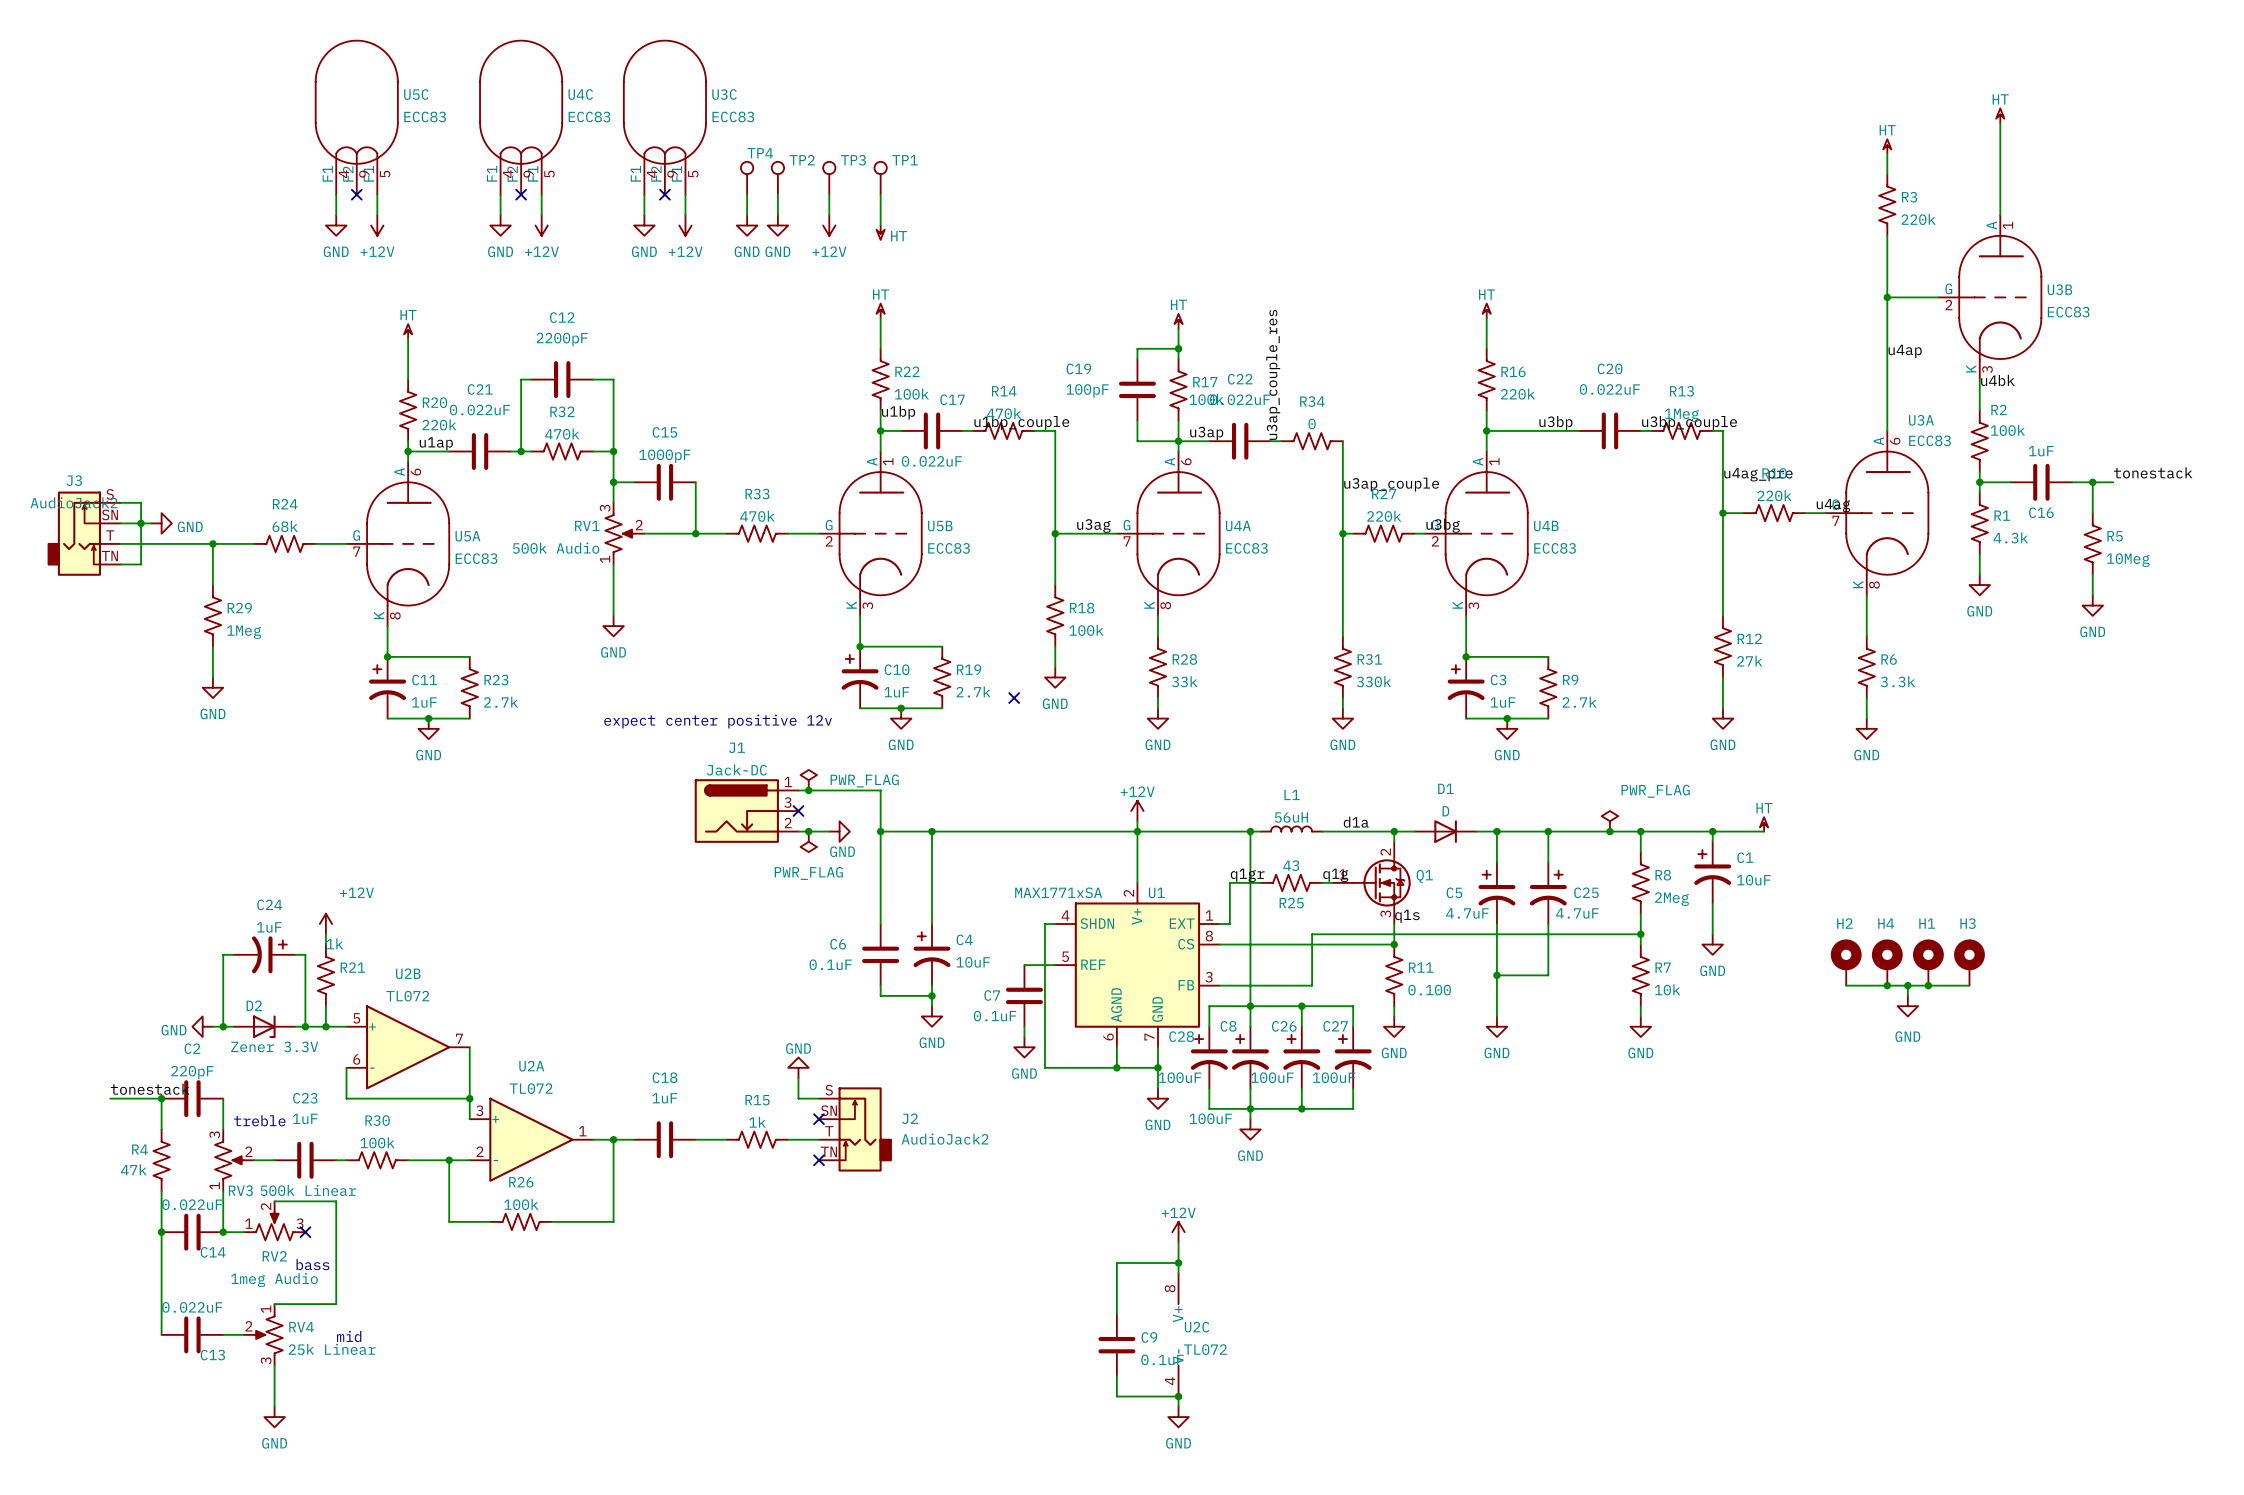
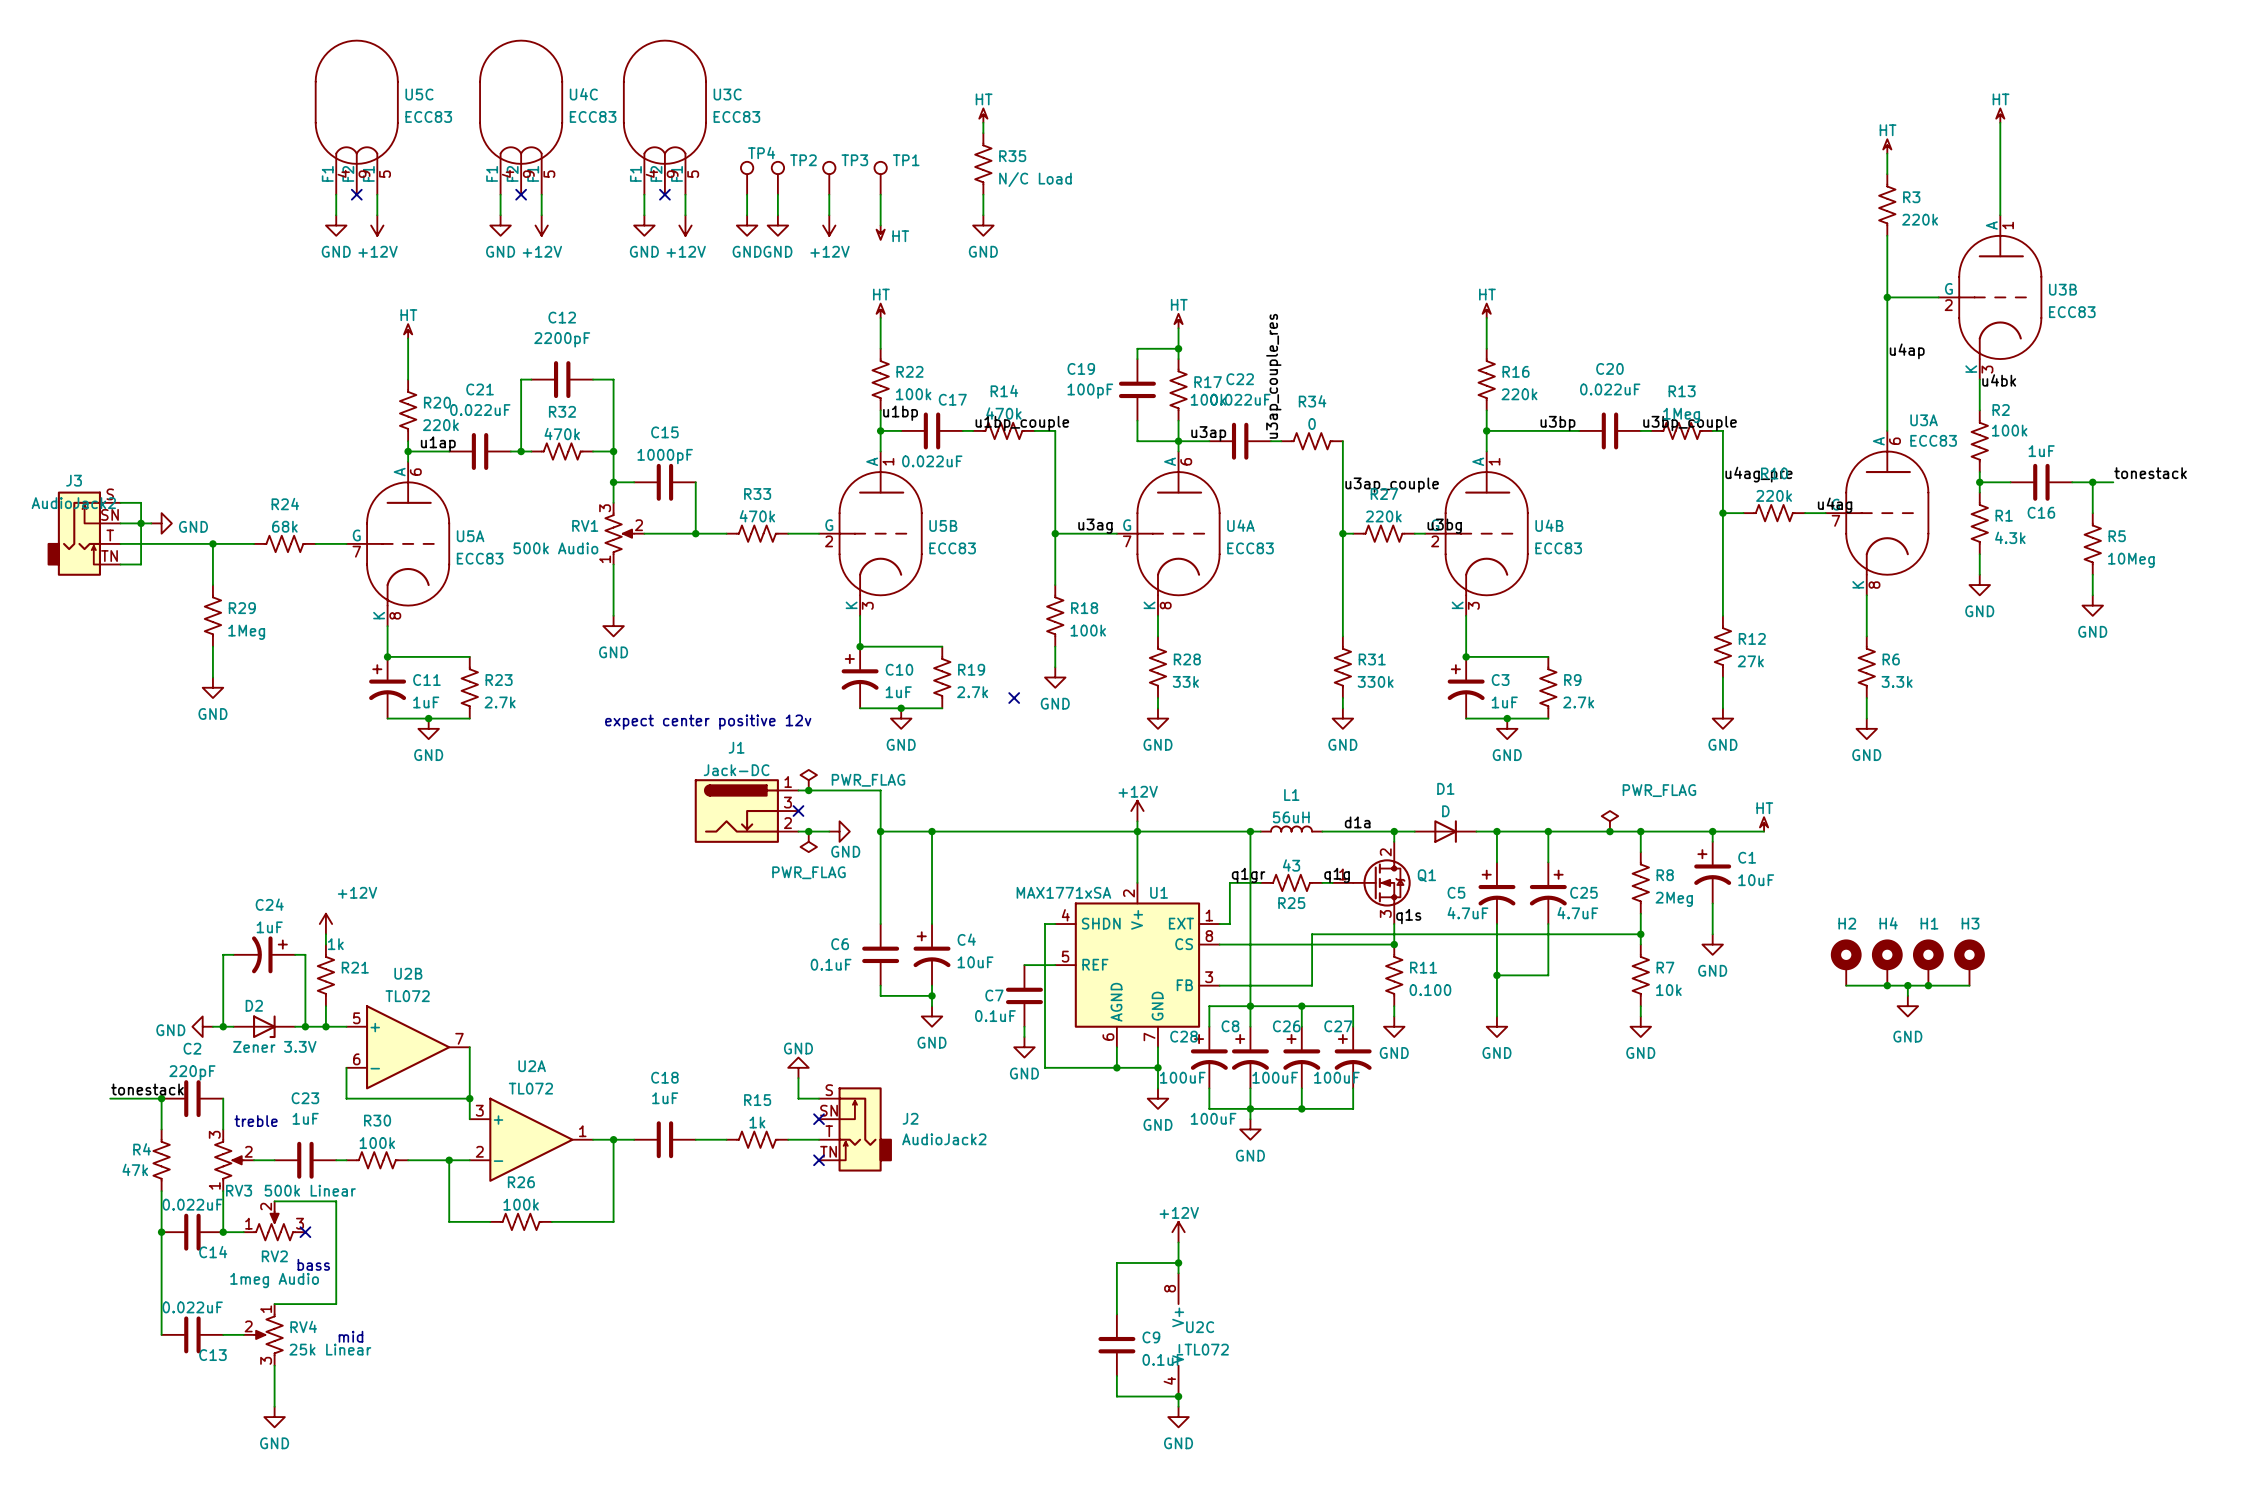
power symbol: none -> HT (983, 115)
wire: none -> (983, 122) (983, 133)
R35: none -> N/C Load (983, 163)
wire: none -> (983, 194) (983, 215)
power symbol: none -> GND (983, 225)

